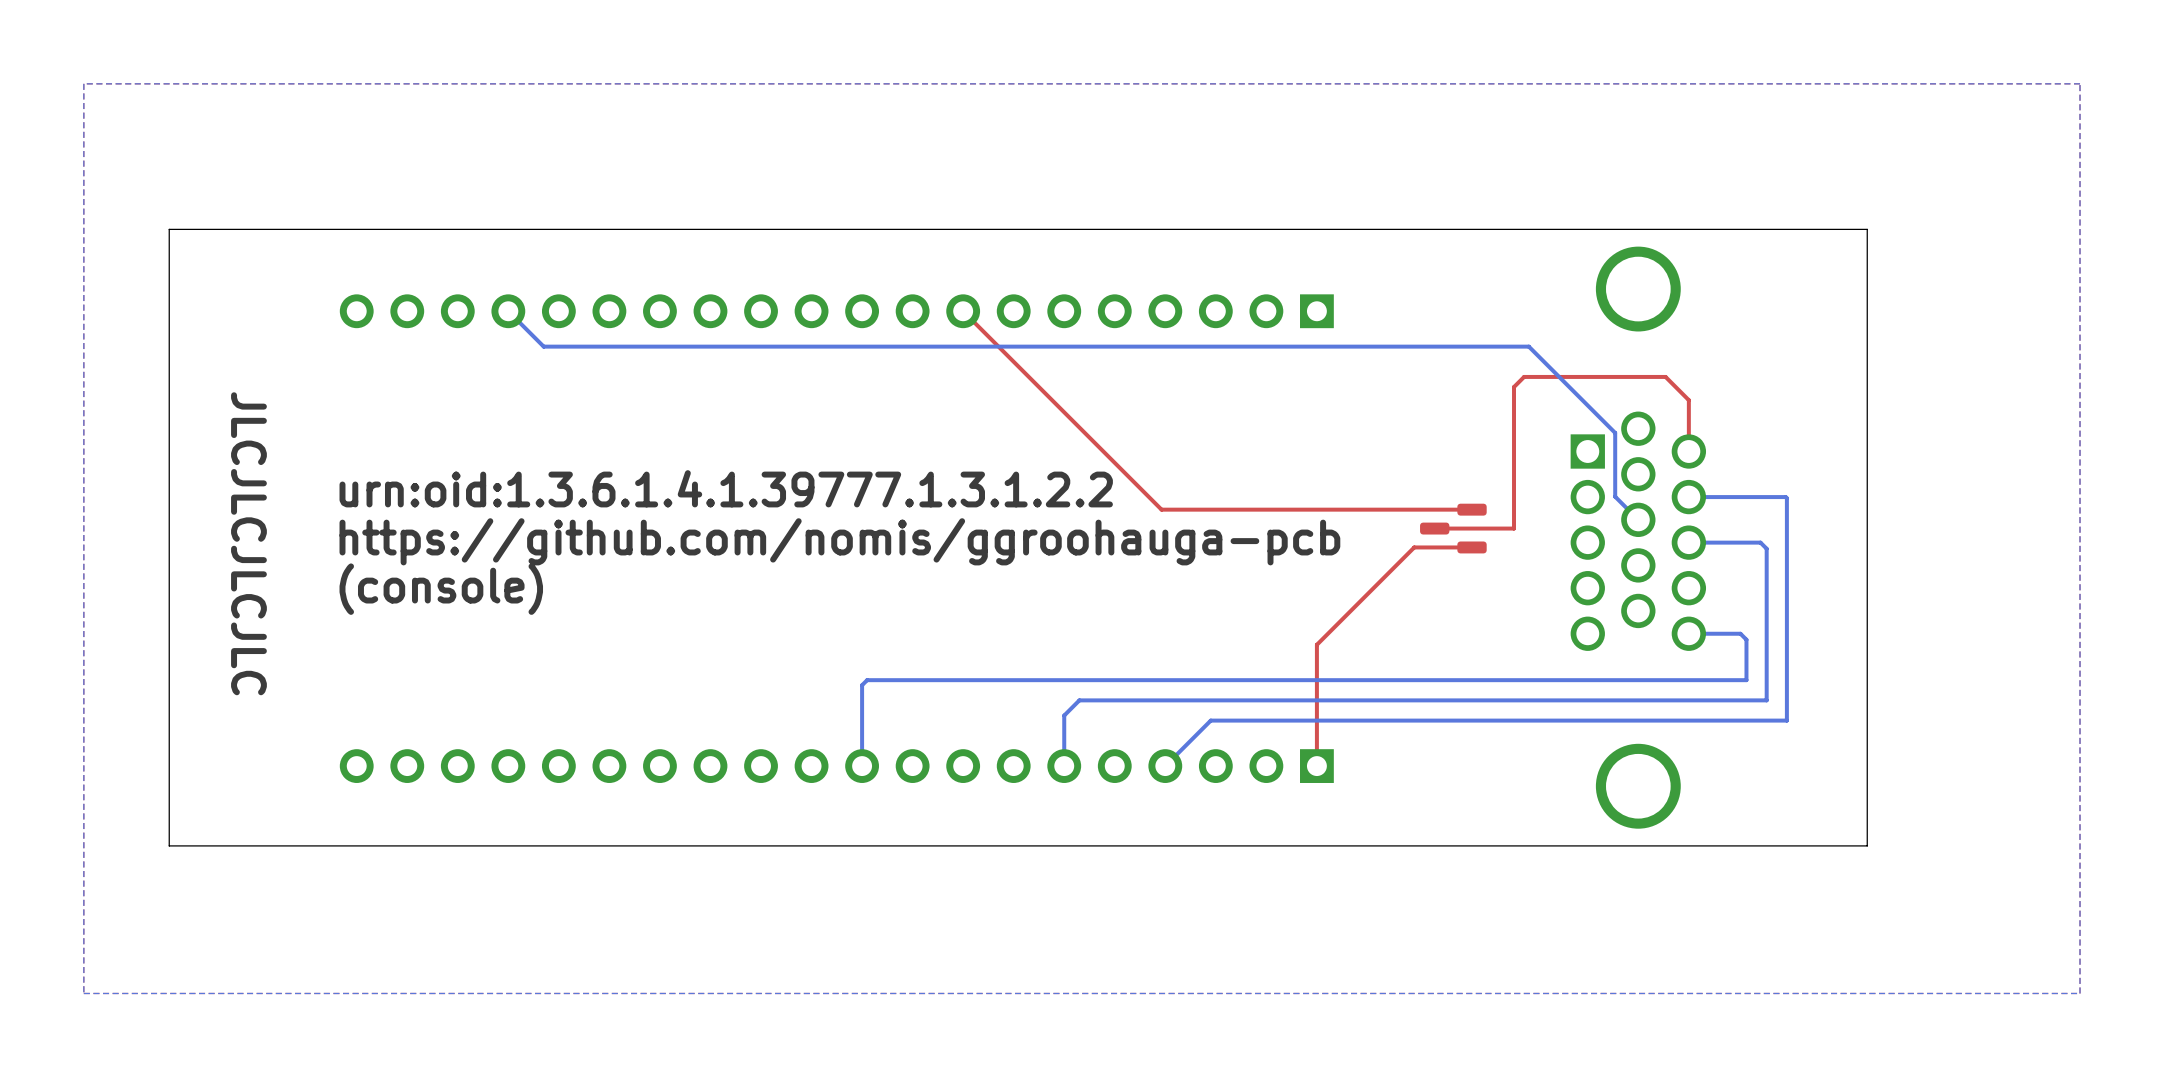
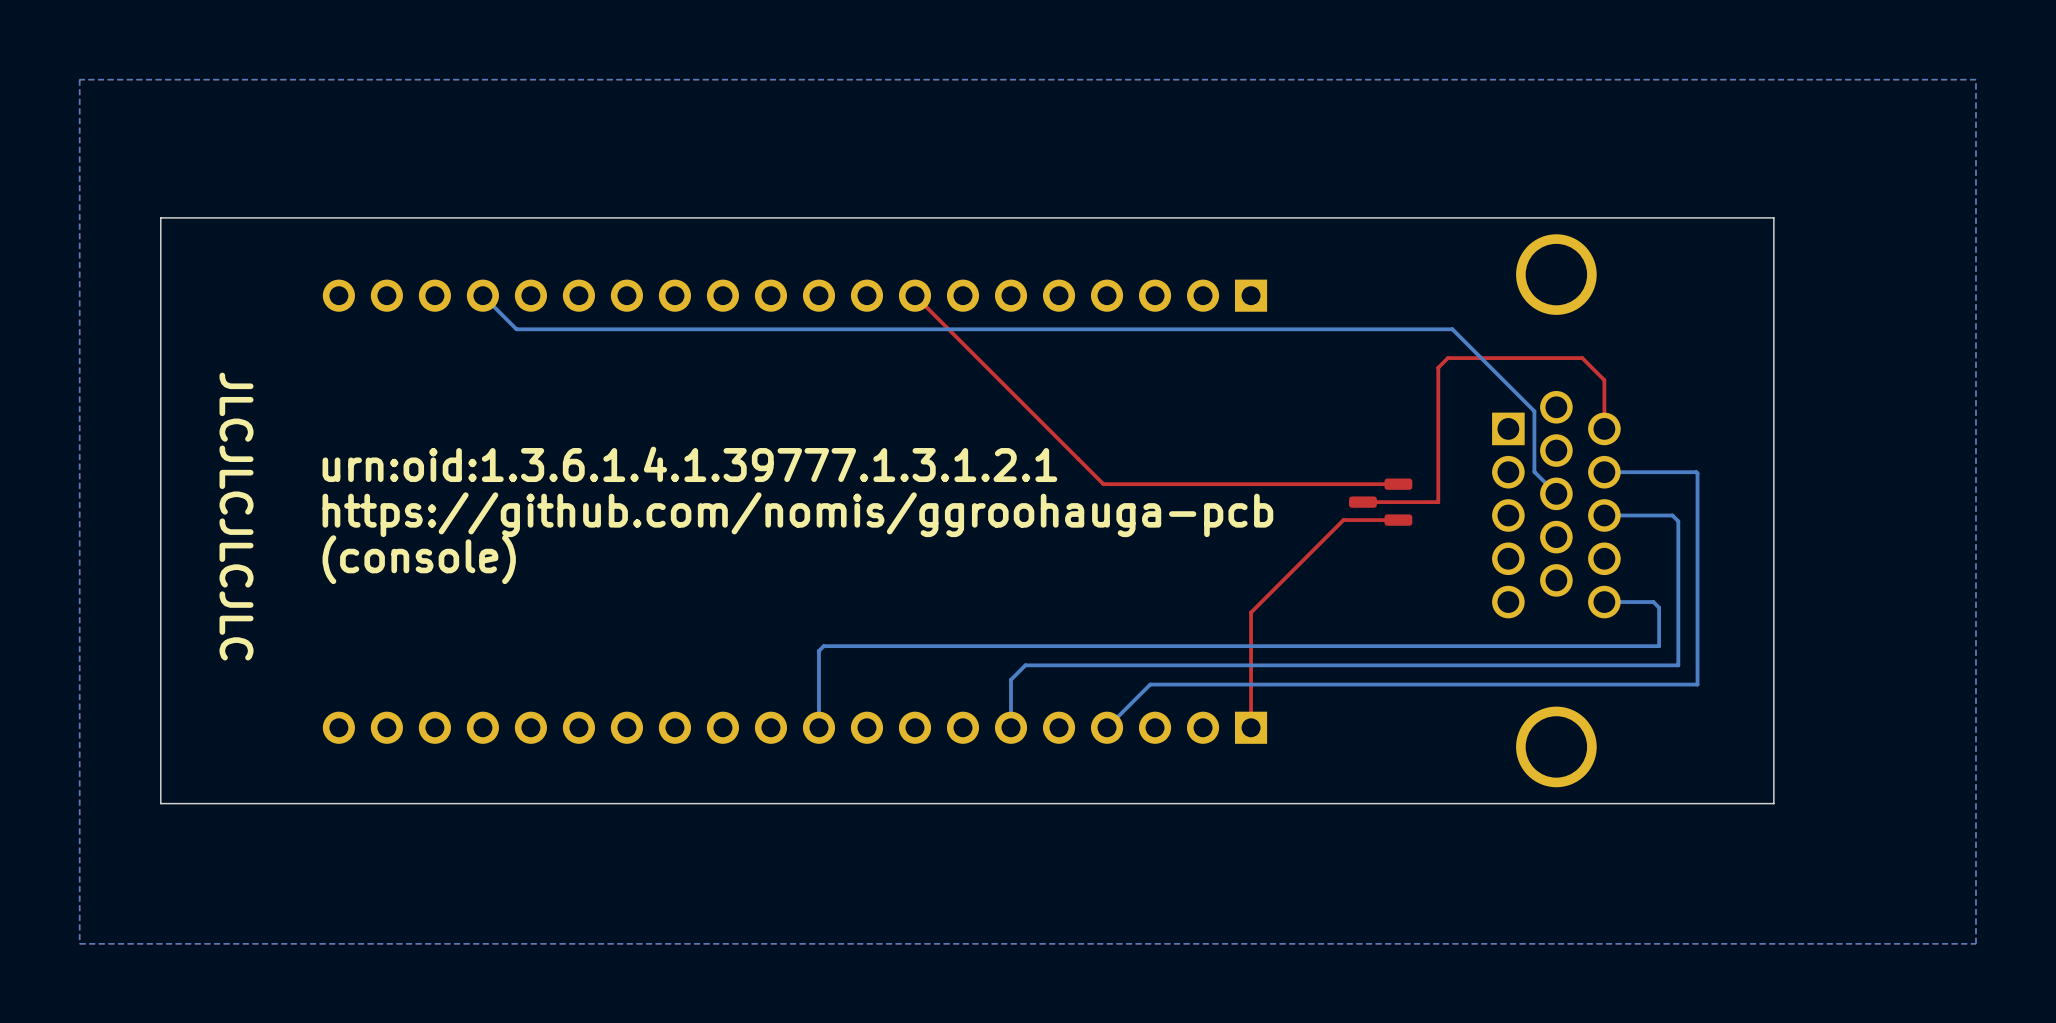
text: urn:oid:1.3.6.1.4.1.39777.1.3.1.2.2 (726, 488) -> urn:oid:1.3.6.1.4.1.39777.1.3.1.2.1 (689, 464)

